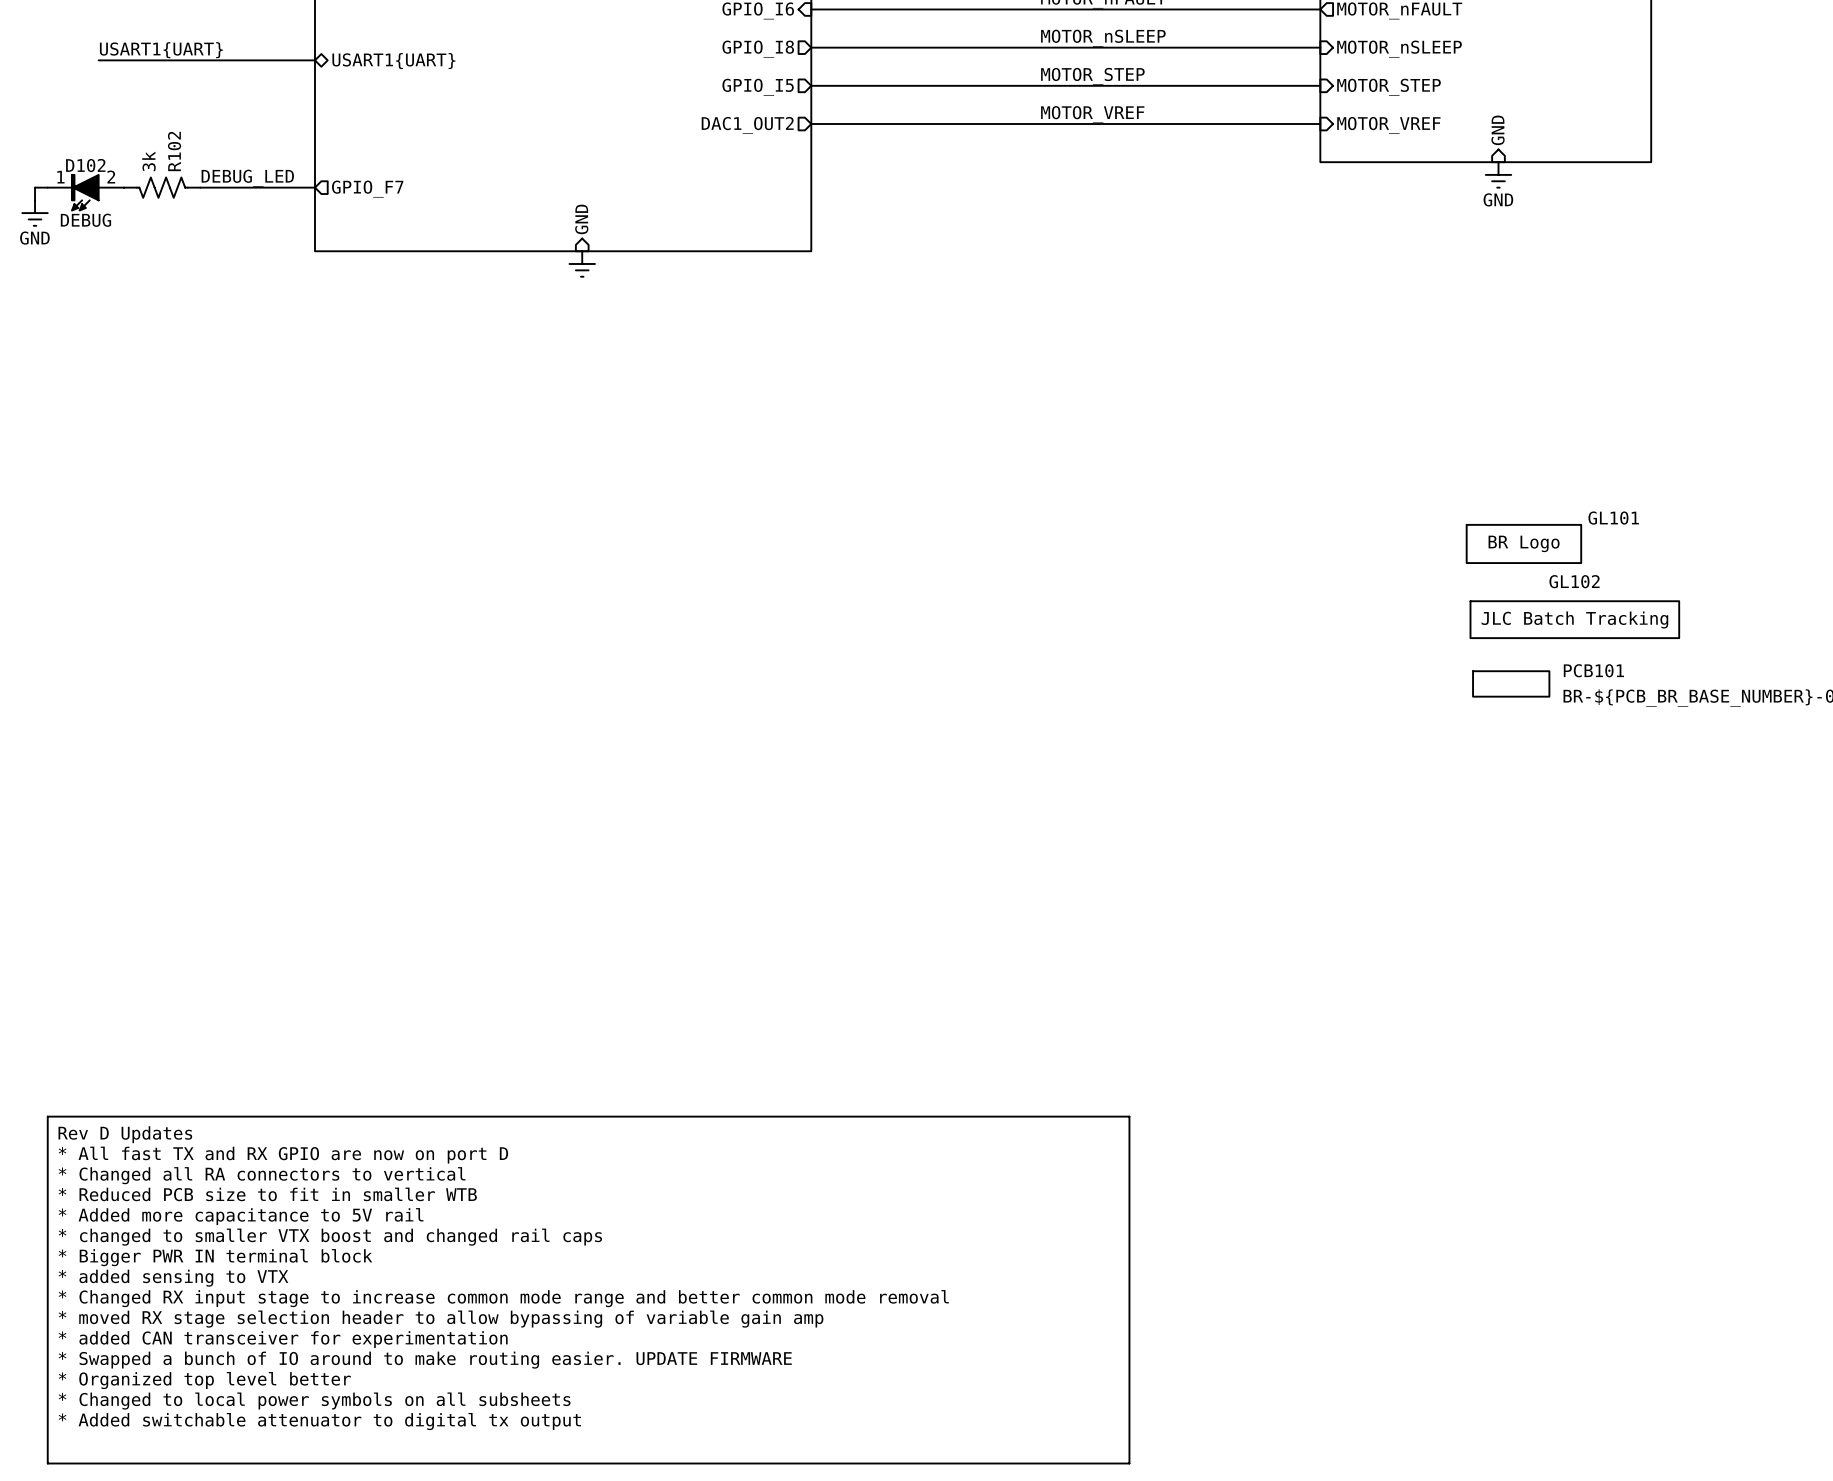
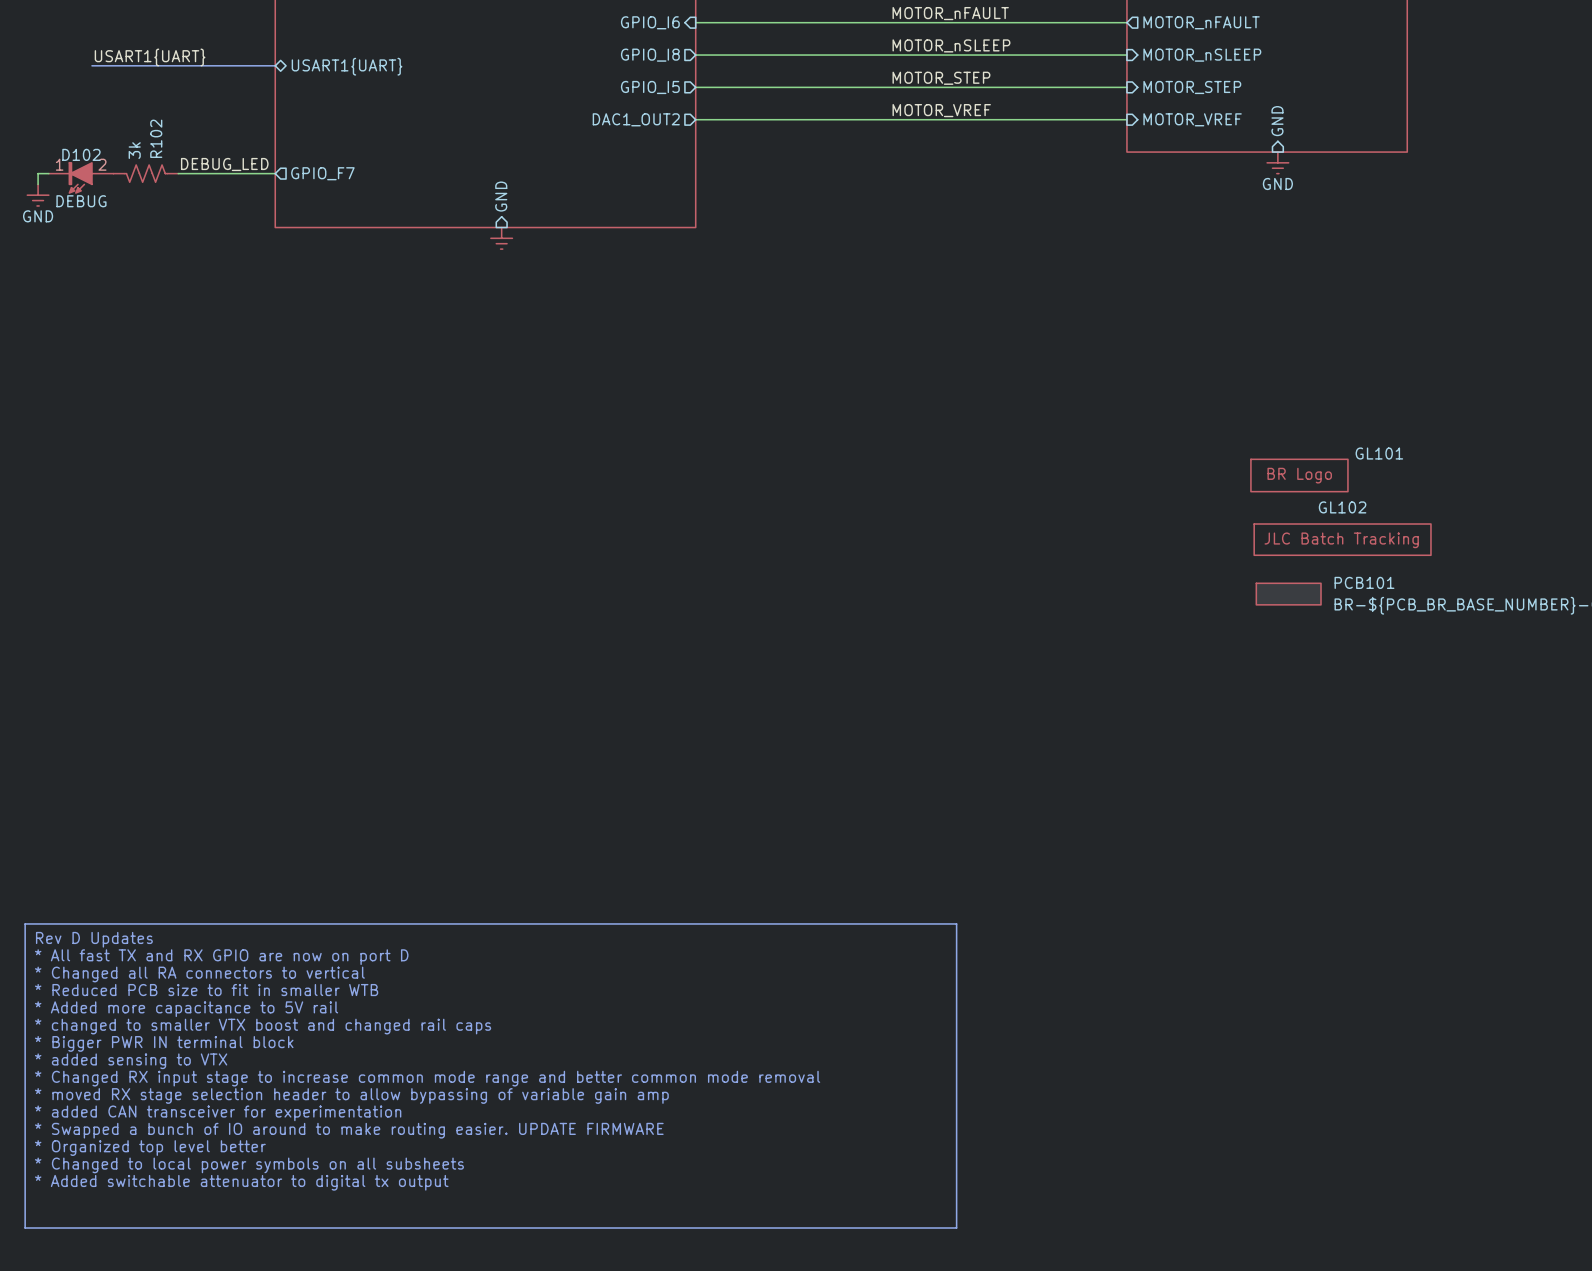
line: (47, 1116) (1129, 1116) (1129, 1463) (47, 1463) (47, 1116) -> (25, 923) (25, 1228) (956, 1228) (956, 923) (25, 923)
text position: Rev D Updates (125, 1134) -> Rev D Updates (94, 939)
text position: * All fast TX and RX GPIO are now on port D (283, 1155) -> * All fast TX and RX GPIO are now on port D (221, 957)
text position: * Changed all RA connectors to vertical (262, 1175) -> * Changed all RA connectors to vertical (199, 974)
text position: * Reduced PCB size to fit in smaller WTB (267, 1194) -> * Reduced PCB size to fit in smaller WTB (206, 990)
text position: * Added more capacitance to 5V rail (241, 1216) -> * Added more capacitance to 5V rail (186, 1009)
text position: * changed to smaller VTX boost and changed rail caps (330, 1237) -> * changed to smaller VTX boost and changed rail caps (263, 1026)
text position: * Bigger PWR IN terminal block (215, 1257) -> * Bigger PWR IN terminal block (164, 1043)
text position: * added sensing to VTX (173, 1278) -> * added sensing to VTX (131, 1061)
text position: * Changed RX input stage to increase common mode range and better common mode removal (503, 1298) -> * Changed RX input stage to increase common mode range and better common mode removal (427, 1078)
text position: * moved RX stage selection header to allow bypassing of variable gain amp (441, 1319) -> * moved RX stage selection header to allow bypassing of variable gain amp (351, 1095)
text position: * added CAN transceiver for experimentation (283, 1339) -> * added CAN transceiver for experimentation (218, 1113)
text position: * Swapped a bunch of IO around to make routing easier. UPDATE FIRMWARE (425, 1360) -> * Swapped a bunch of IO around to make routing easier. UPDATE FIRMWARE (349, 1130)
text position: * Organized top level better (204, 1380) -> * Organized top level better (150, 1148)
text position: * Changed to local power symbols on all subsheets (314, 1401) -> * Changed to local power symbols on all subsheets (249, 1165)
text position: * Added switchable attenuator to digital tx output (319, 1421) -> * Added switchable attenuator to digital tx output (241, 1182)

